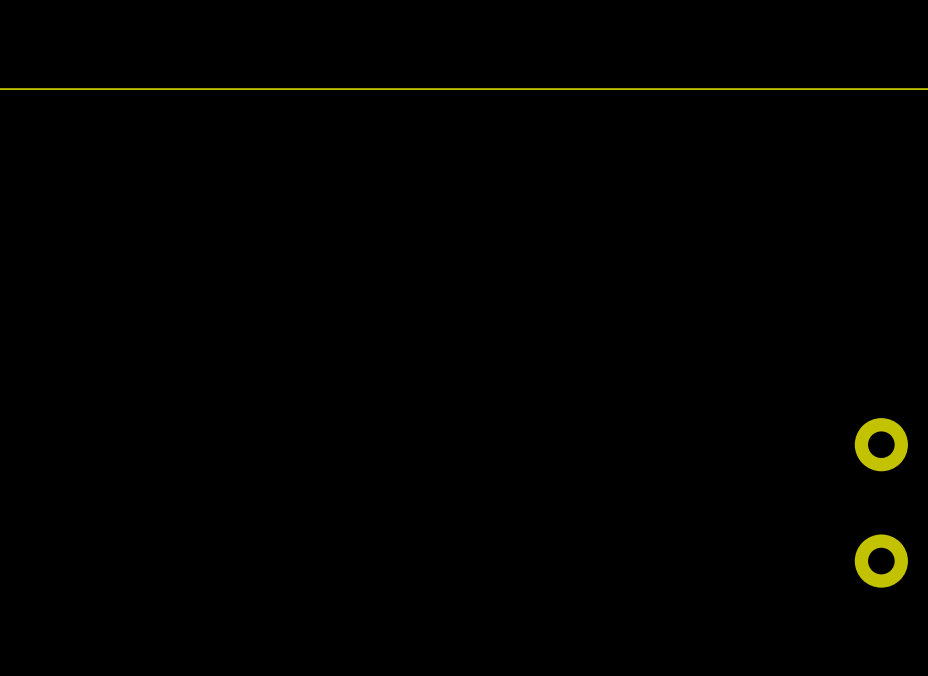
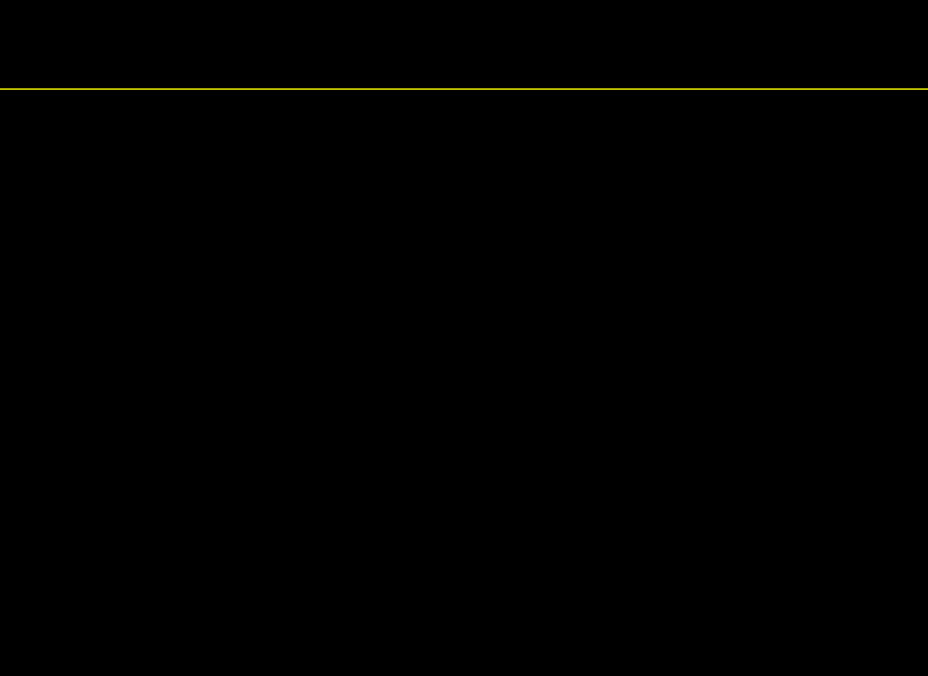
part: (881, 502) -> none

